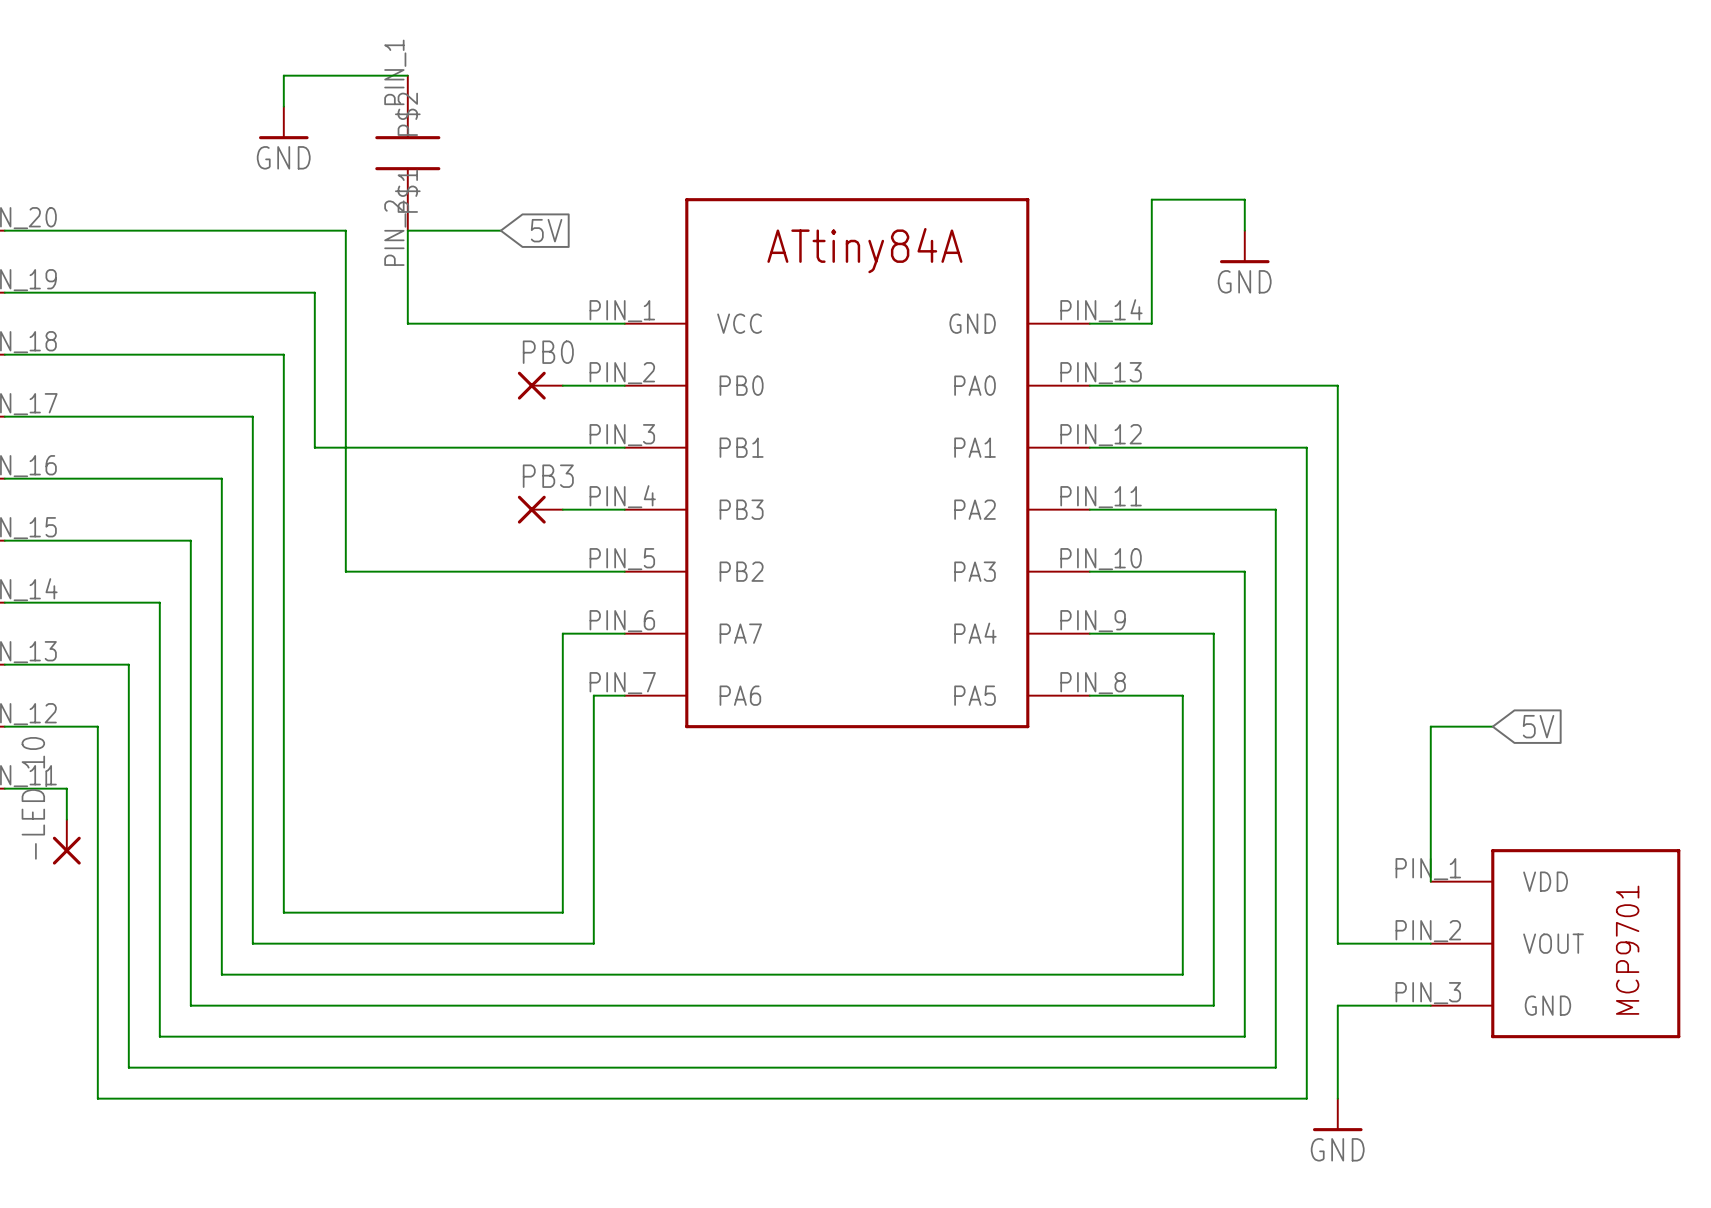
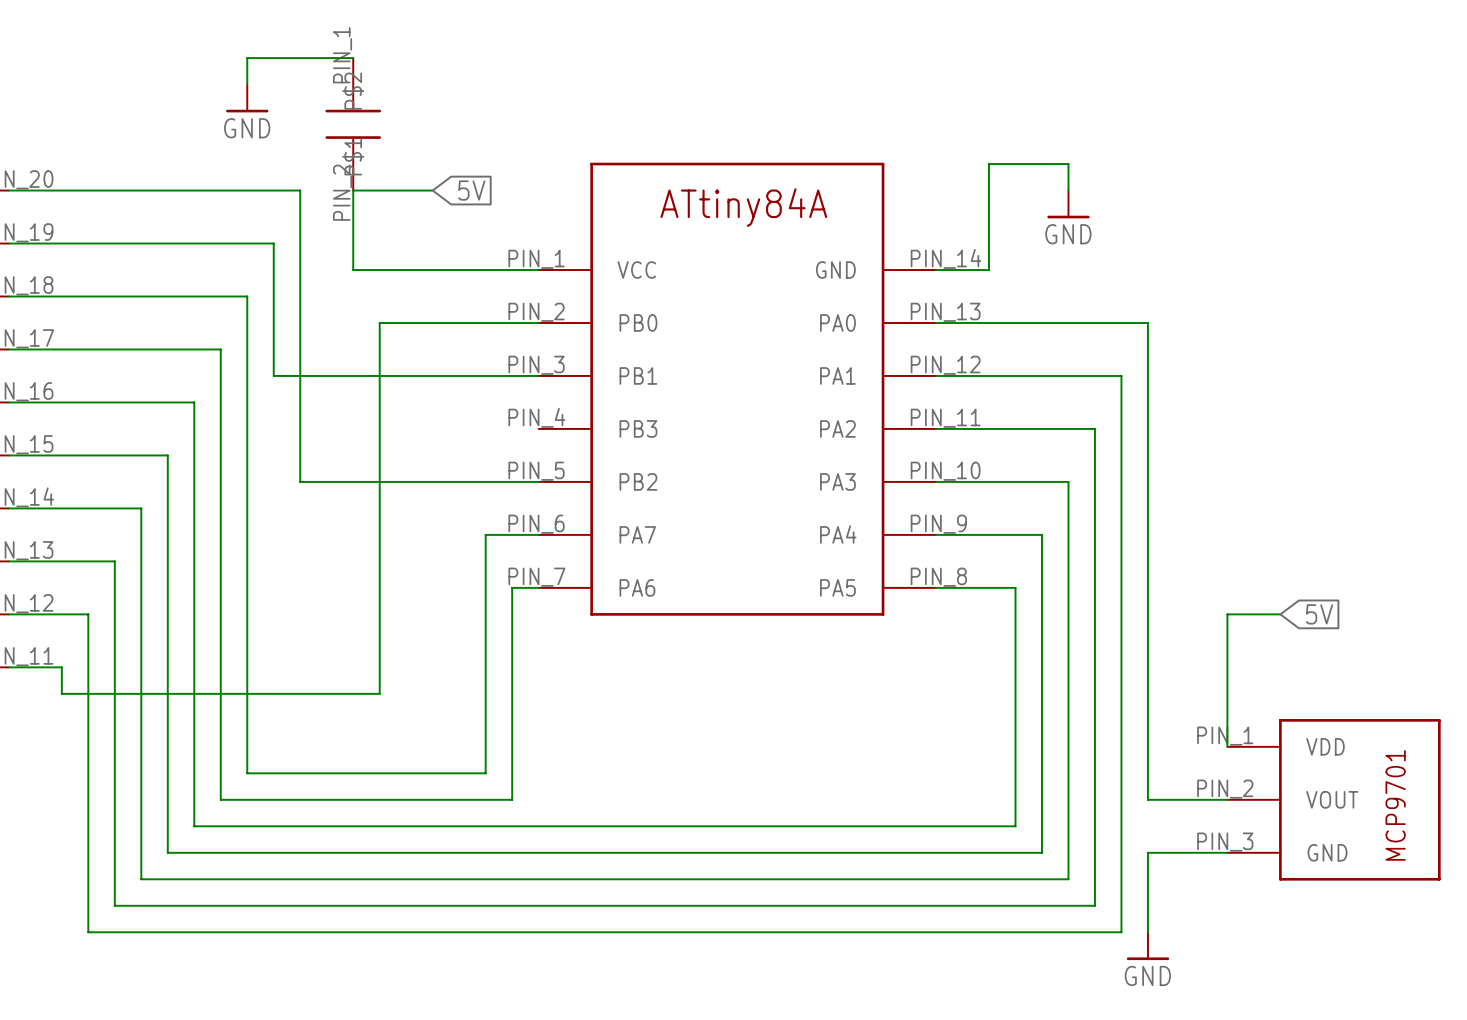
PB0: (540, 385) -> none
wire: none -> (485, 322) (379, 322) (379, 693) (61, 693)
PB3: (540, 509) -> none
wire: (562, 509) (624, 509) -> none
-LED_10: (66, 842) -> none

